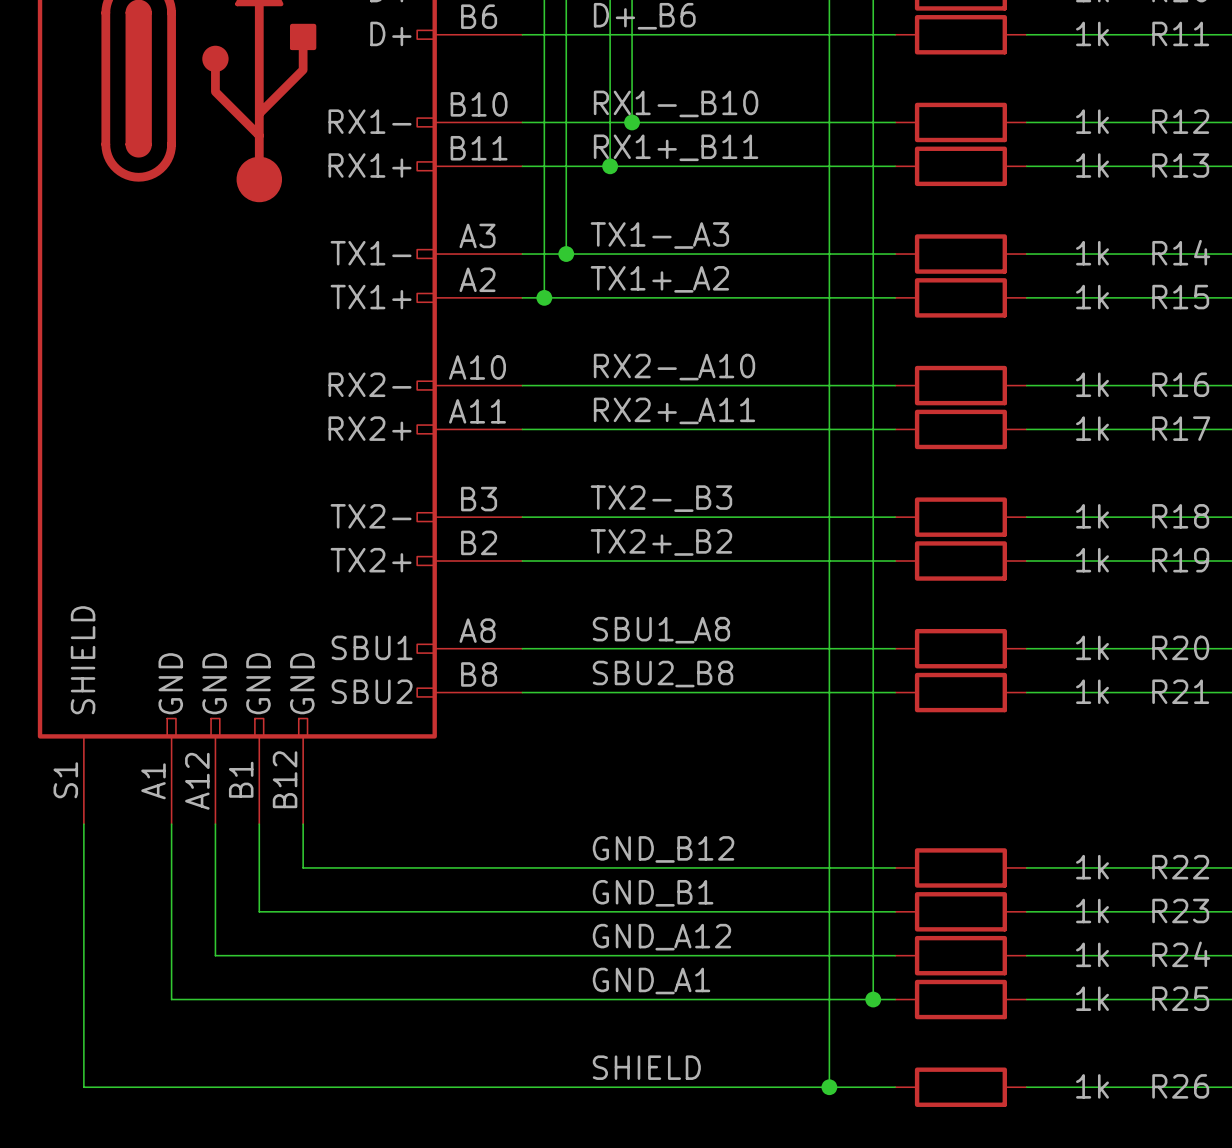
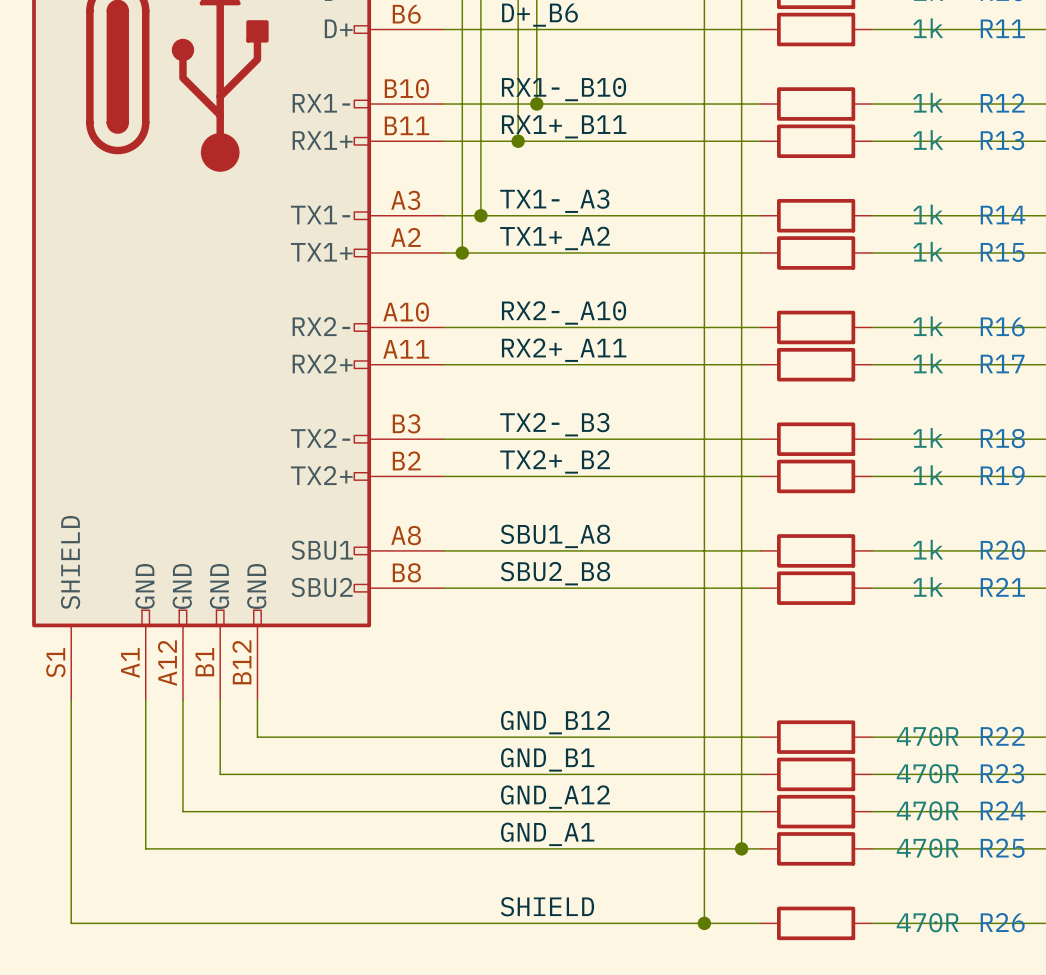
R22 value: 1k (1092, 867) -> 470R (927, 736)
R23 value: 1k (1092, 911) -> 470R (927, 773)
R24 value: 1k (1092, 954) -> 470R (927, 810)
R25 value: 1k (1092, 998) -> 470R (927, 848)
R26 value: 1k (1092, 1086) -> 470R (927, 922)

